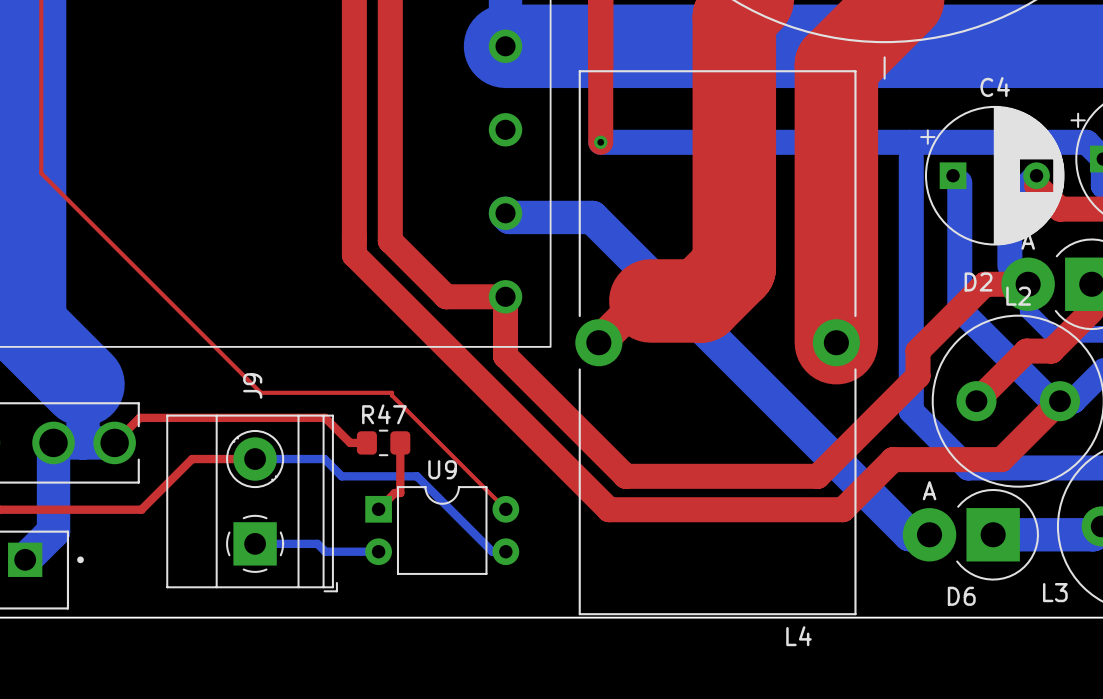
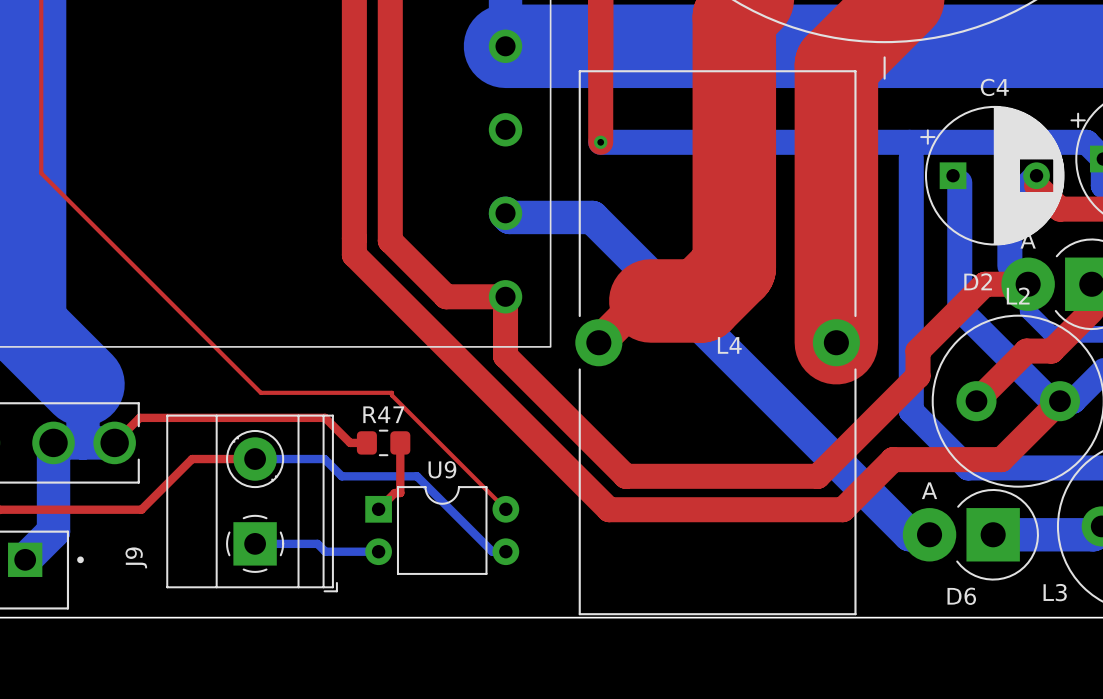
J9 name position: J9 (252, 385) -> J9 (136, 557)
L4 name position: L4 (798, 636) -> L4 (729, 345)

